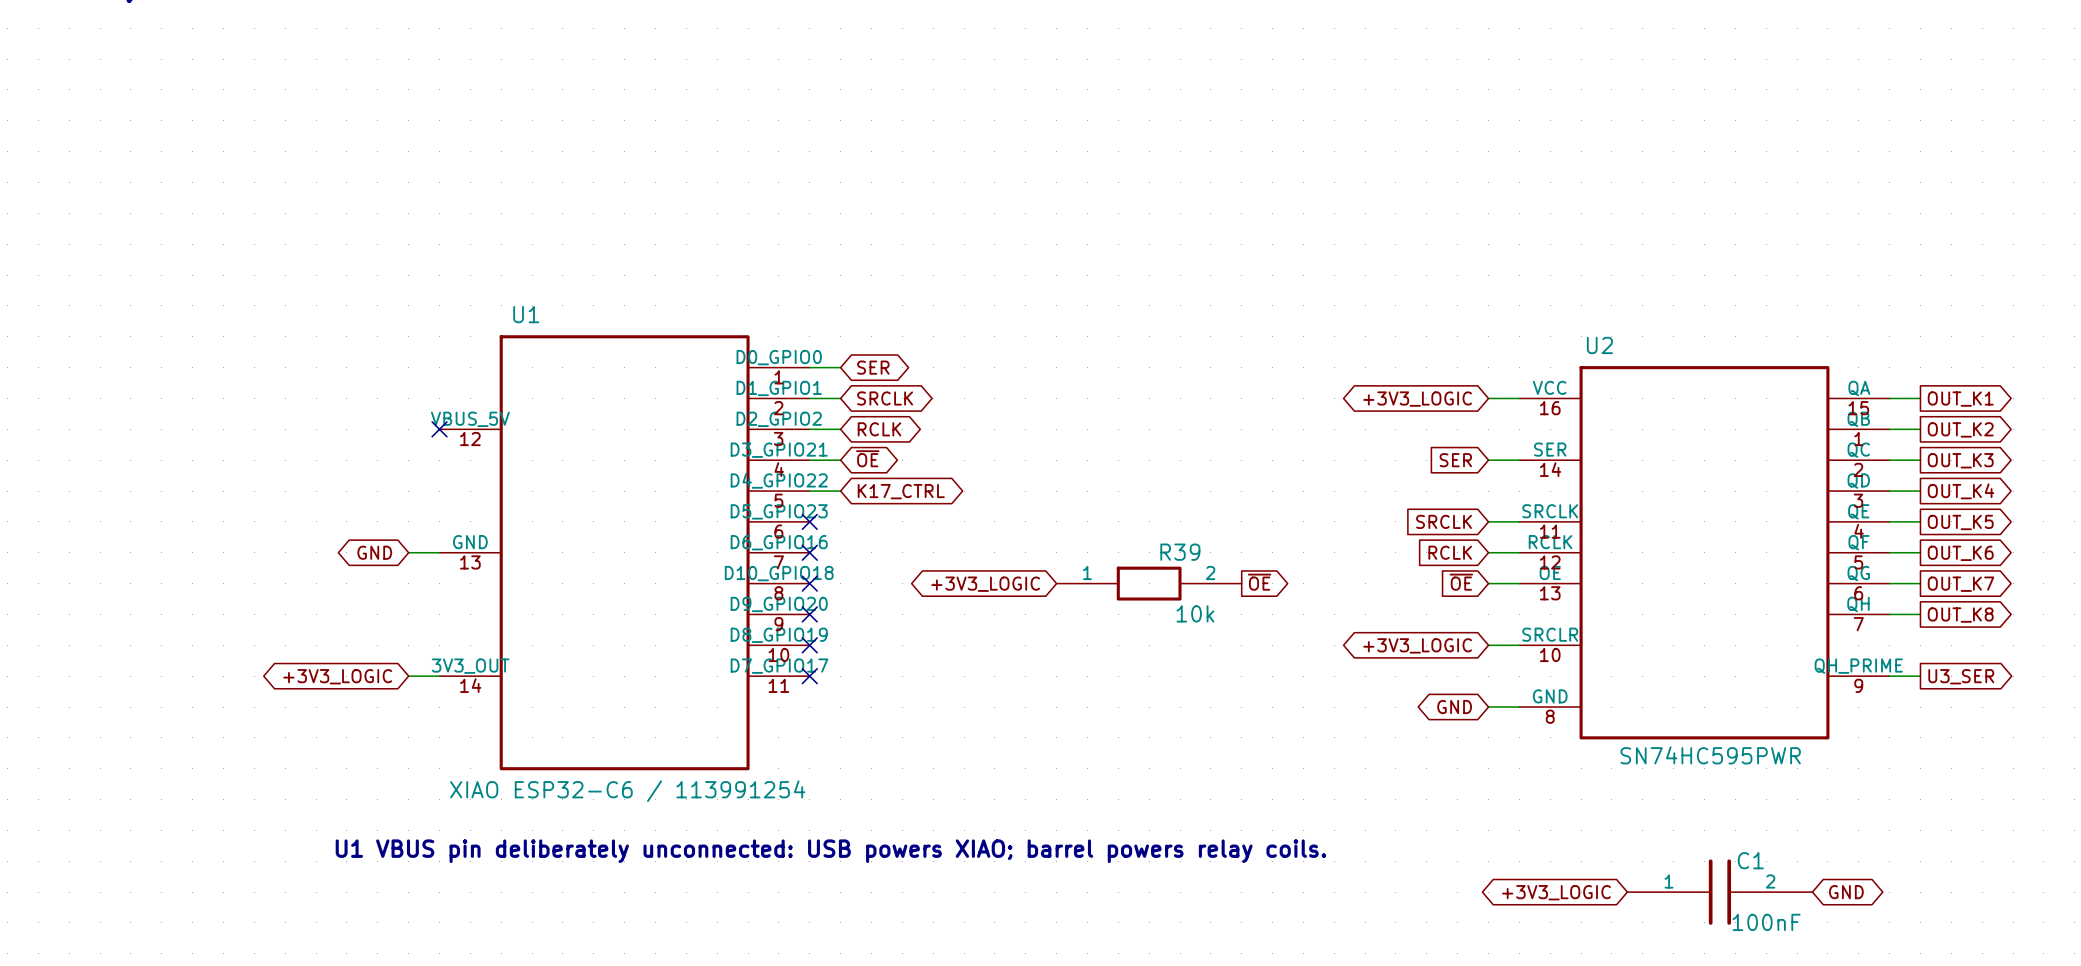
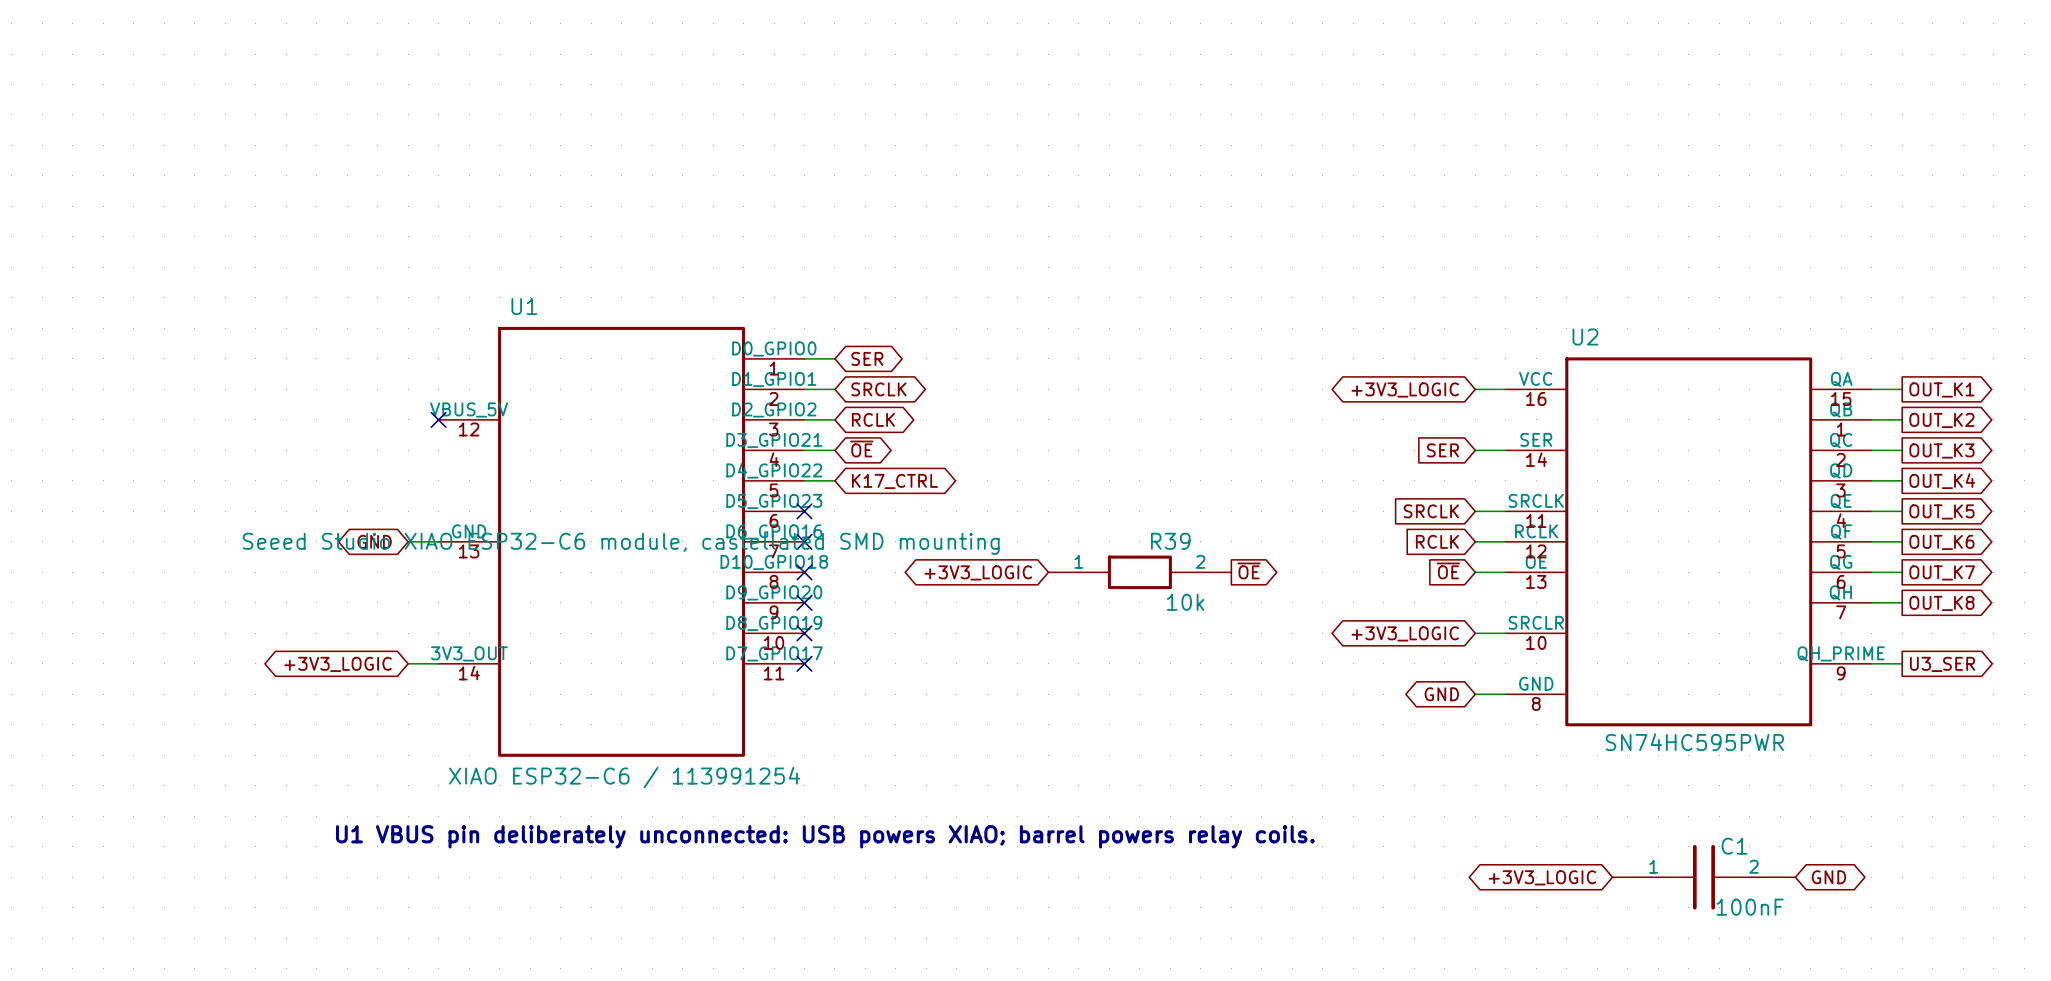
U1 text: none -> Seeed Studio XIAO ESP32-C6 module, castellated SMD mounting (621, 543)

